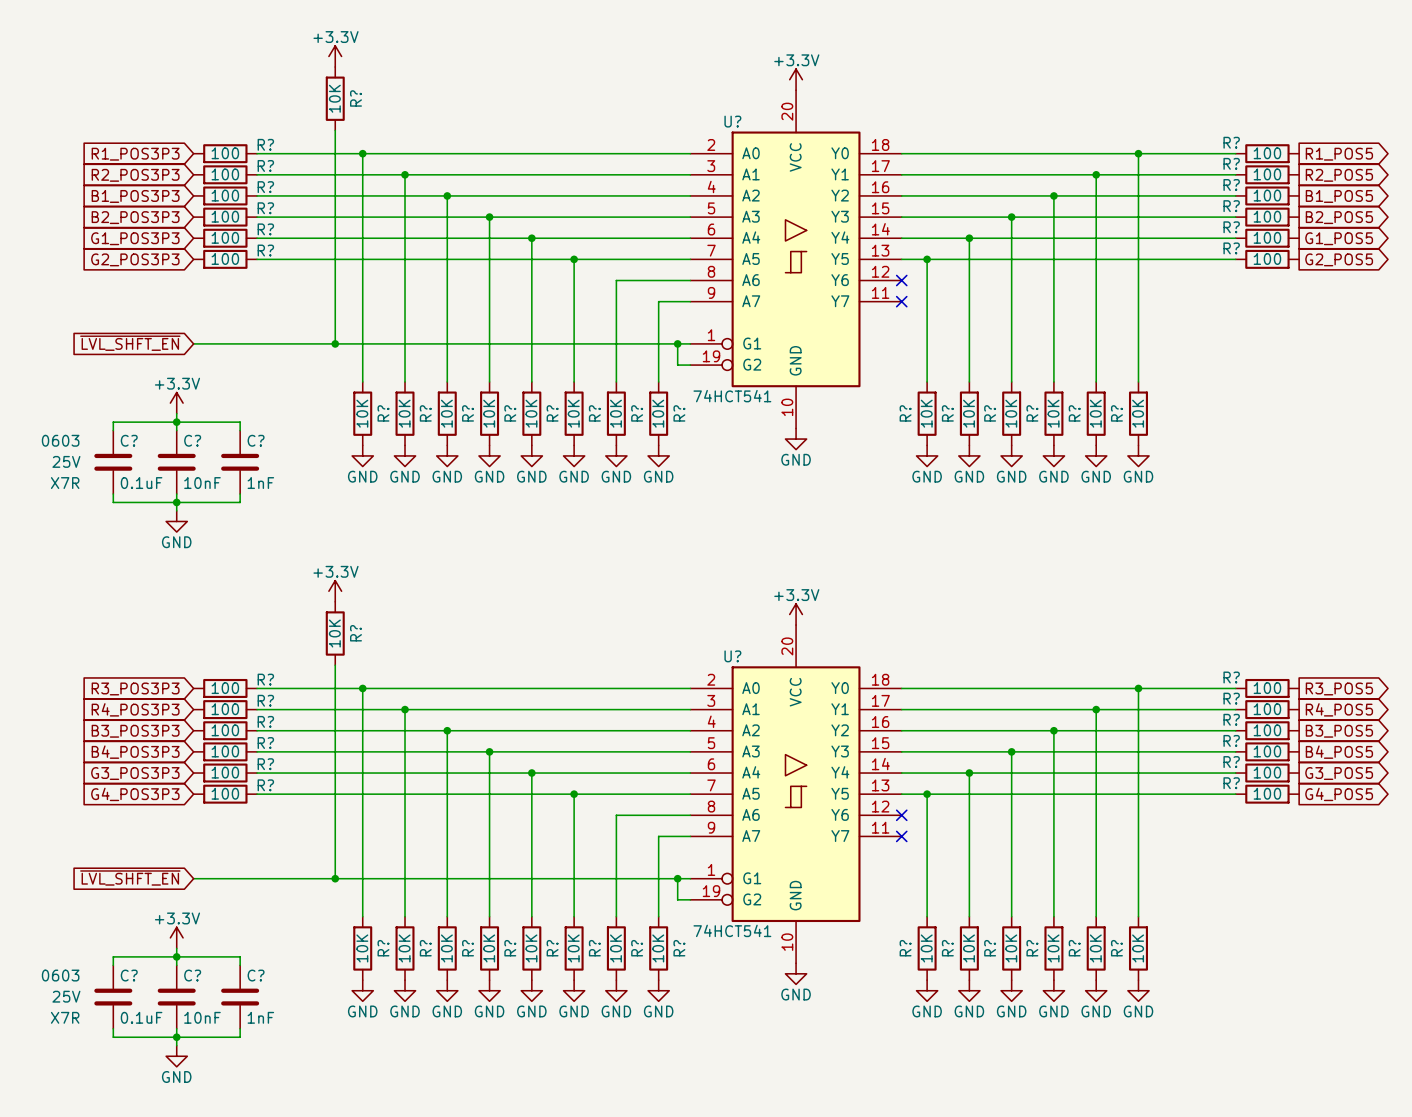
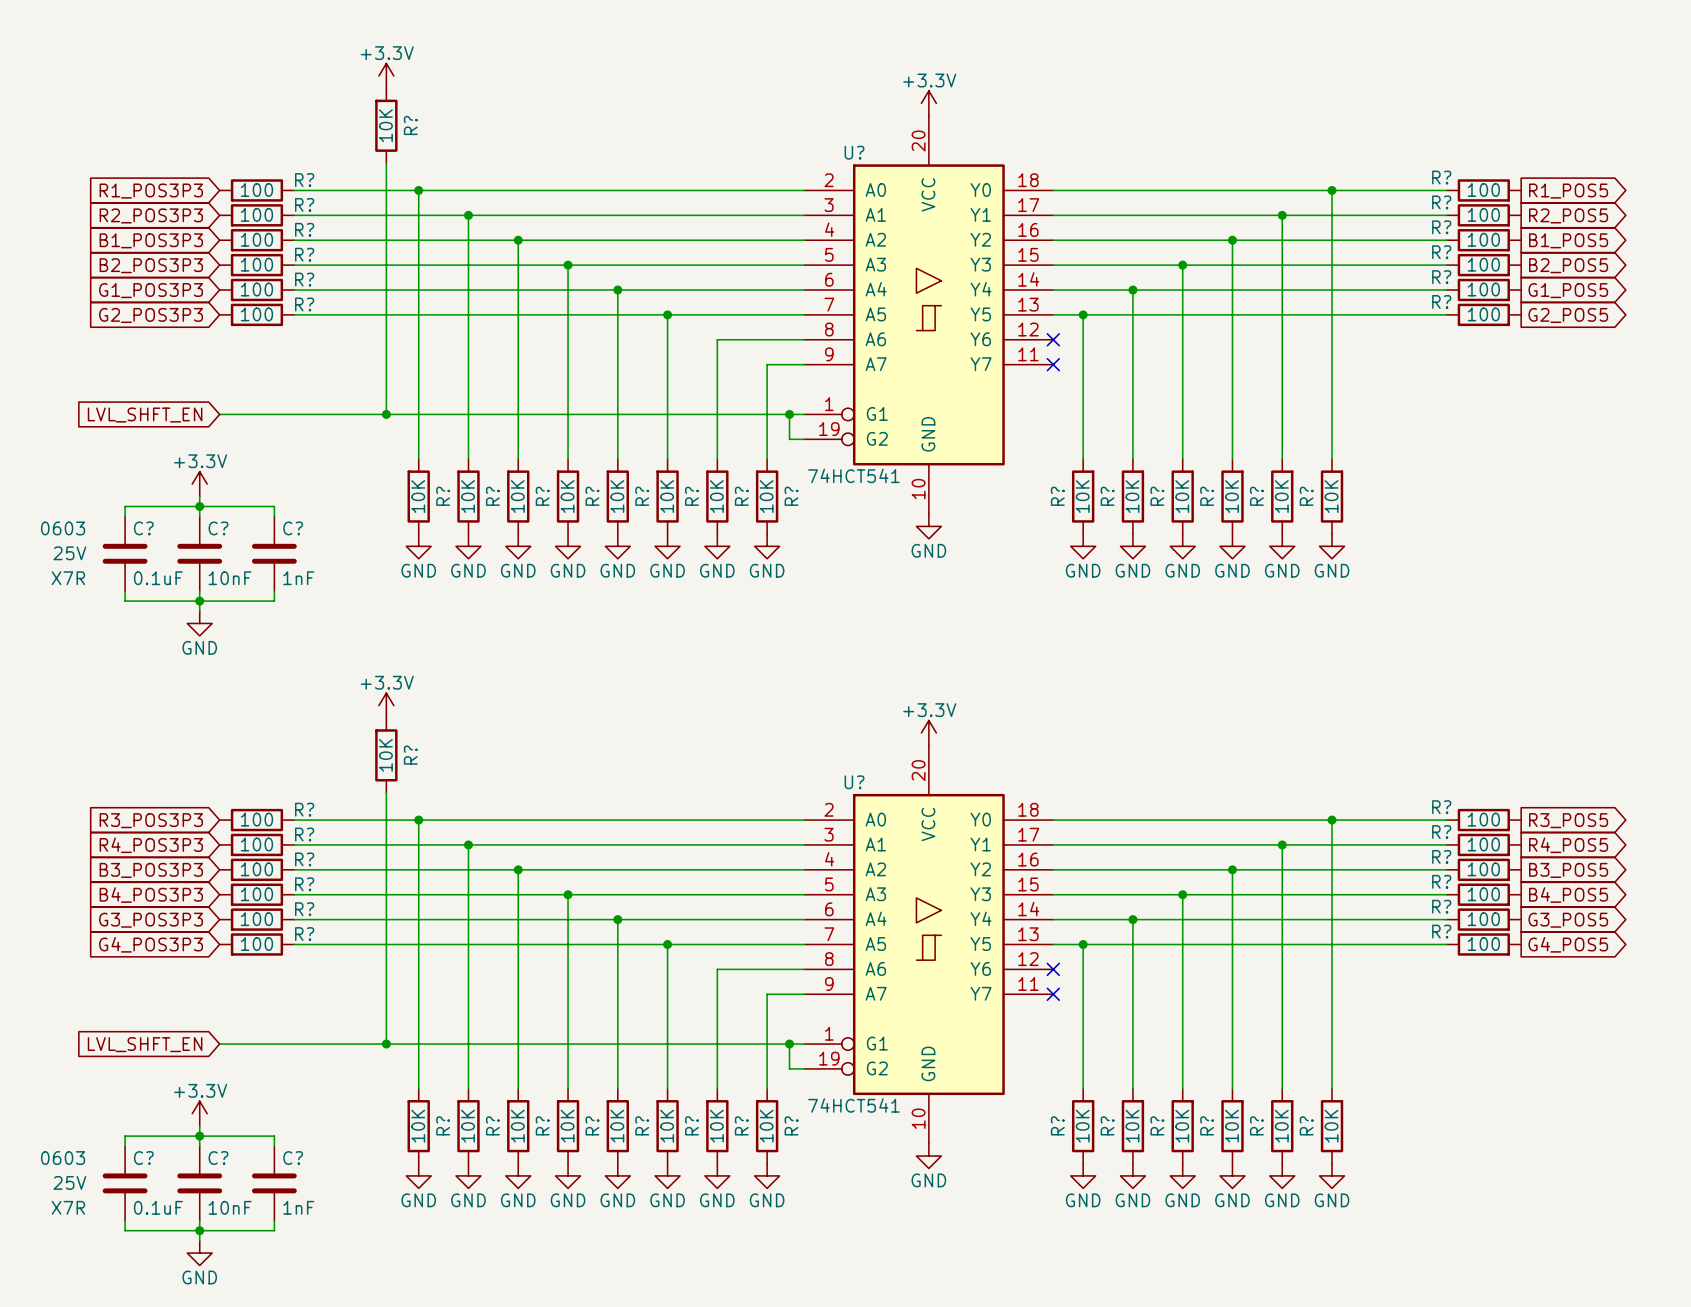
global label: ~{LVL_SHFT_EN} (130, 343) -> LVL_SHFT_EN (145, 415)
global label: ~{LVL_SHFT_EN} (130, 877) -> LVL_SHFT_EN (145, 1044)

